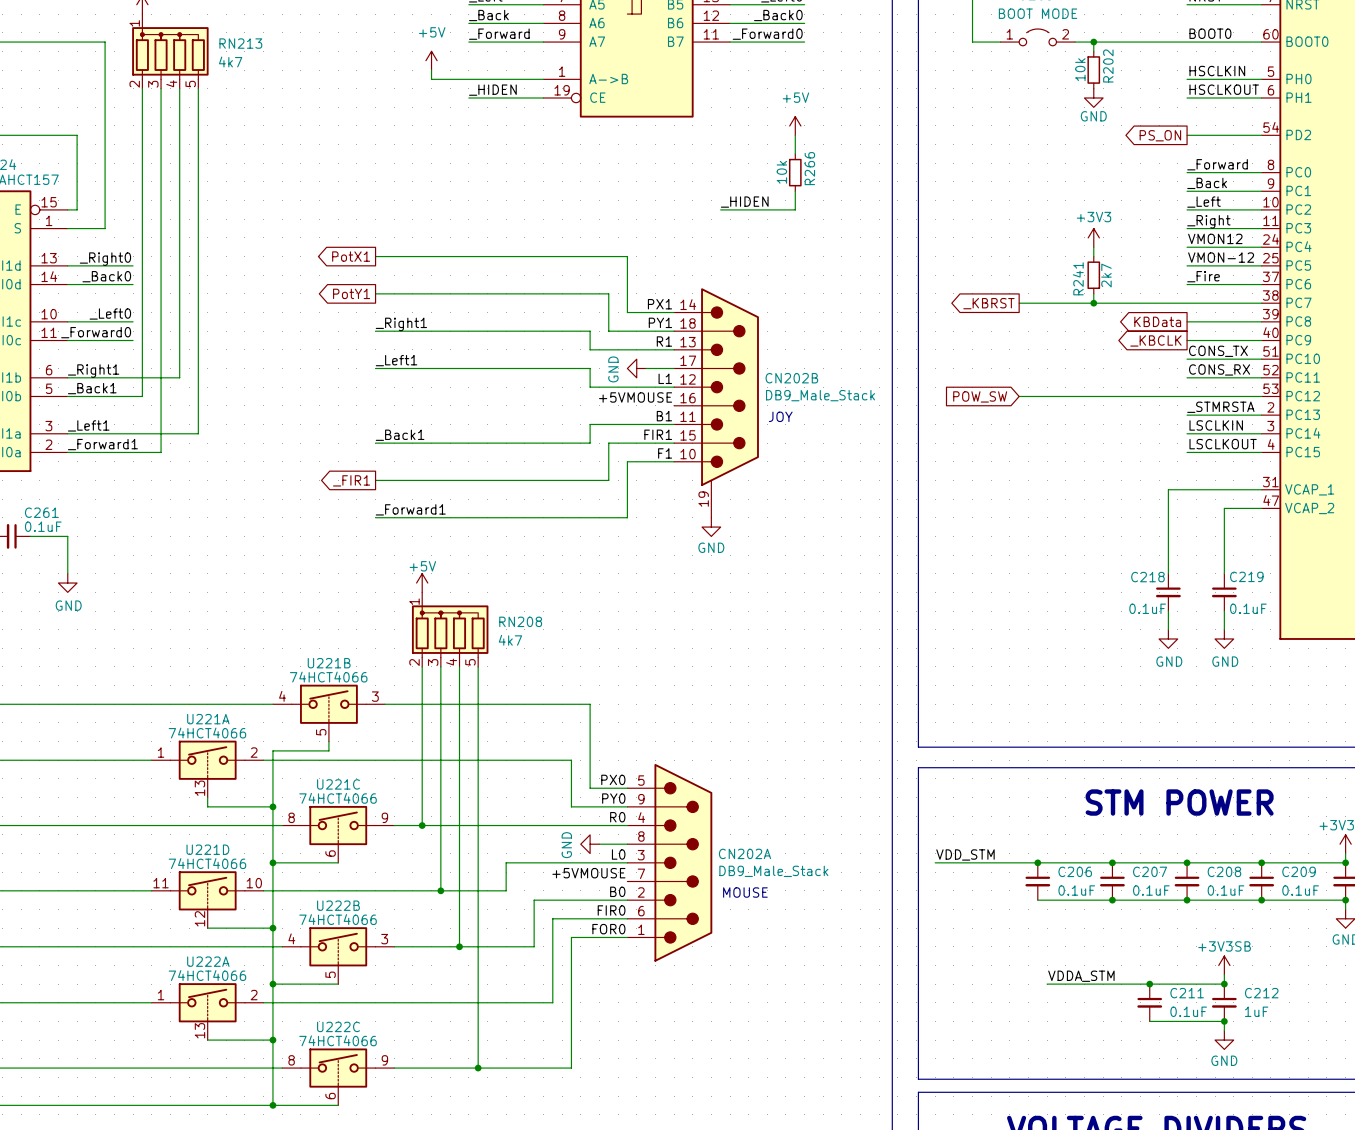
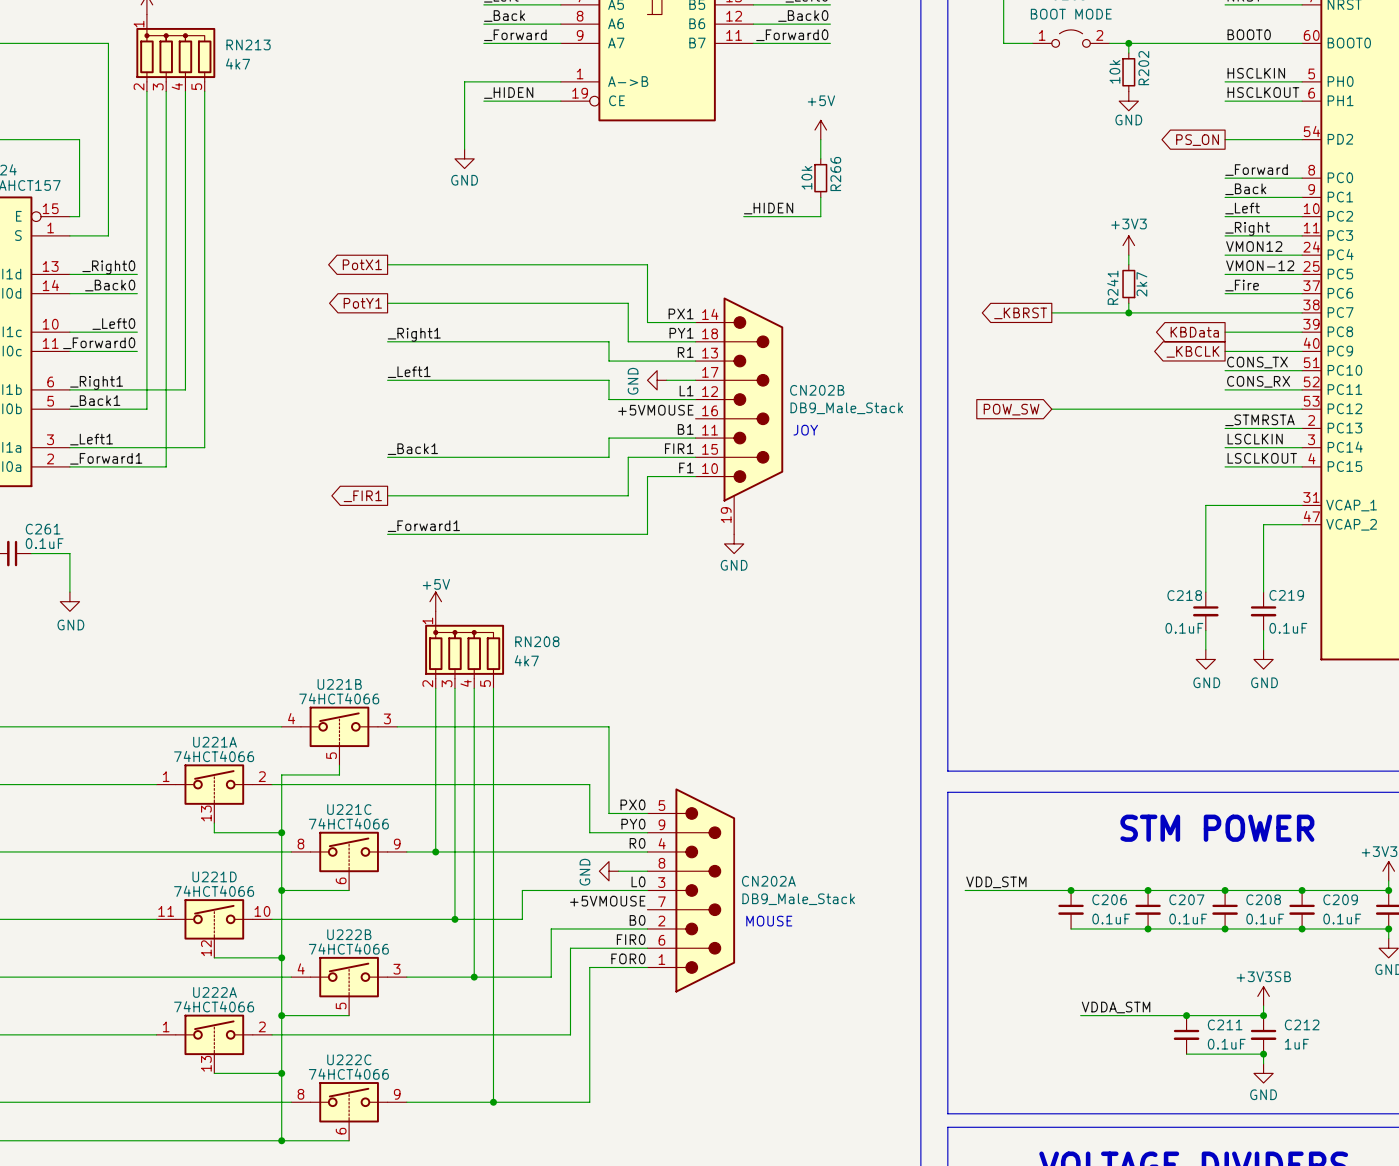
power symbol: +5V (431, 60) -> none
wire: (431, 70) (431, 79) (450, 79) -> (464, 149) (464, 81)
power symbol: none -> GND (464, 158)

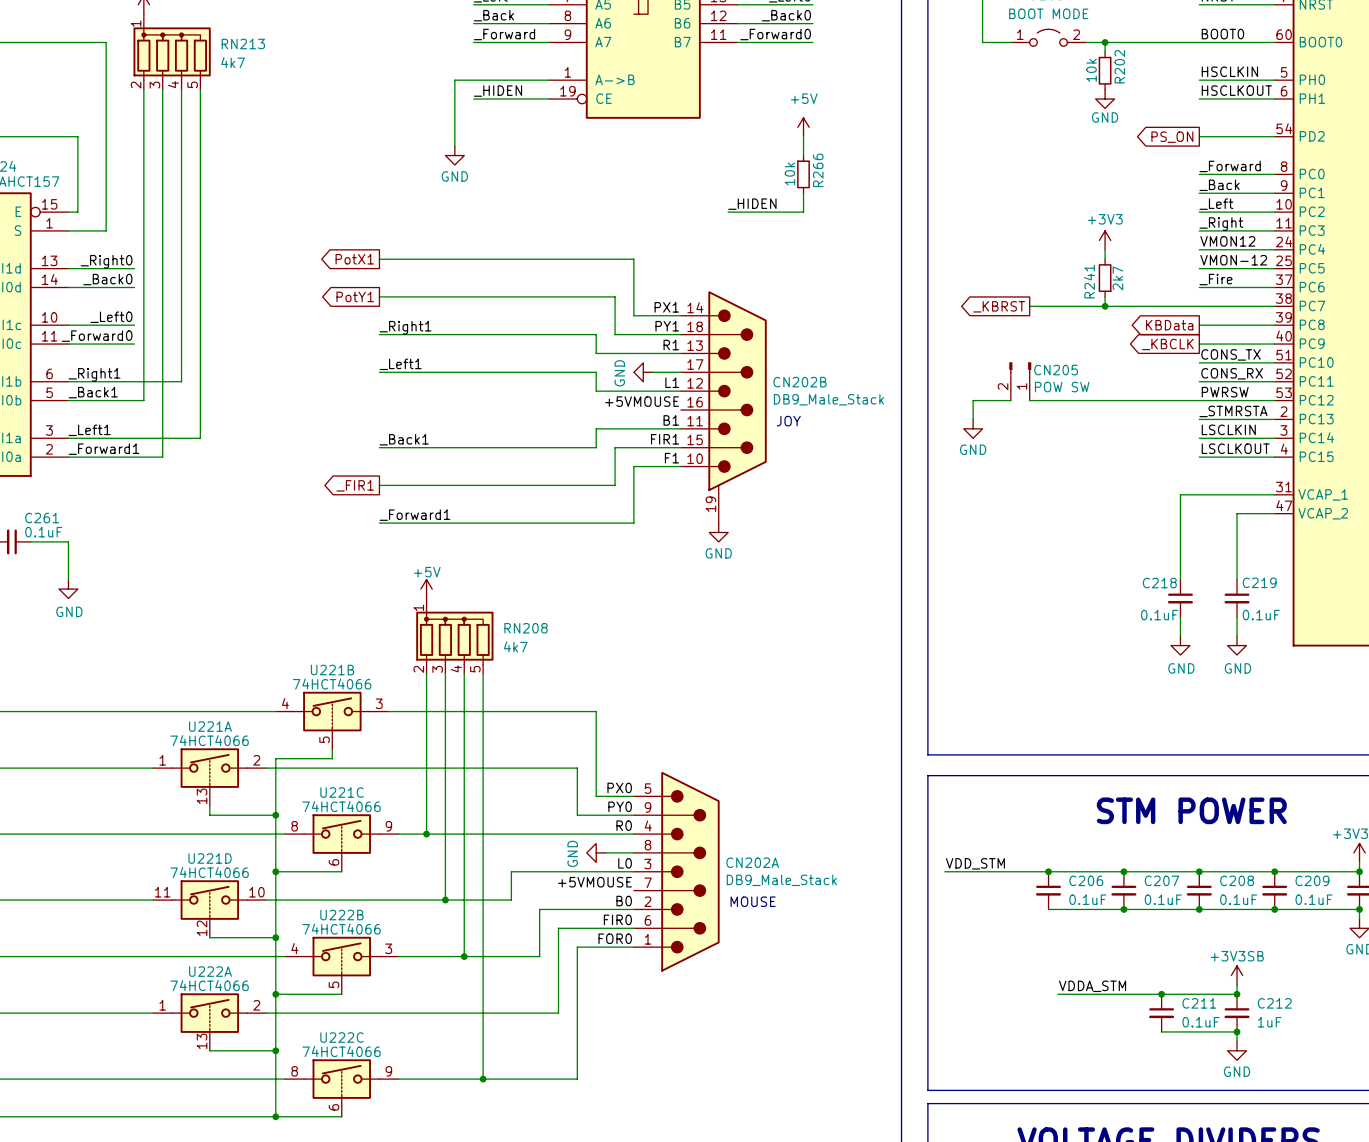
CN205: none -> POW SW (1020, 381)
label: none -> PWRSW (1225, 392)
global label: POW_SW (1011, 409) -> none
wire: none -> (1010, 400) (973, 400) (973, 419)
power symbol: none -> GND (973, 428)

